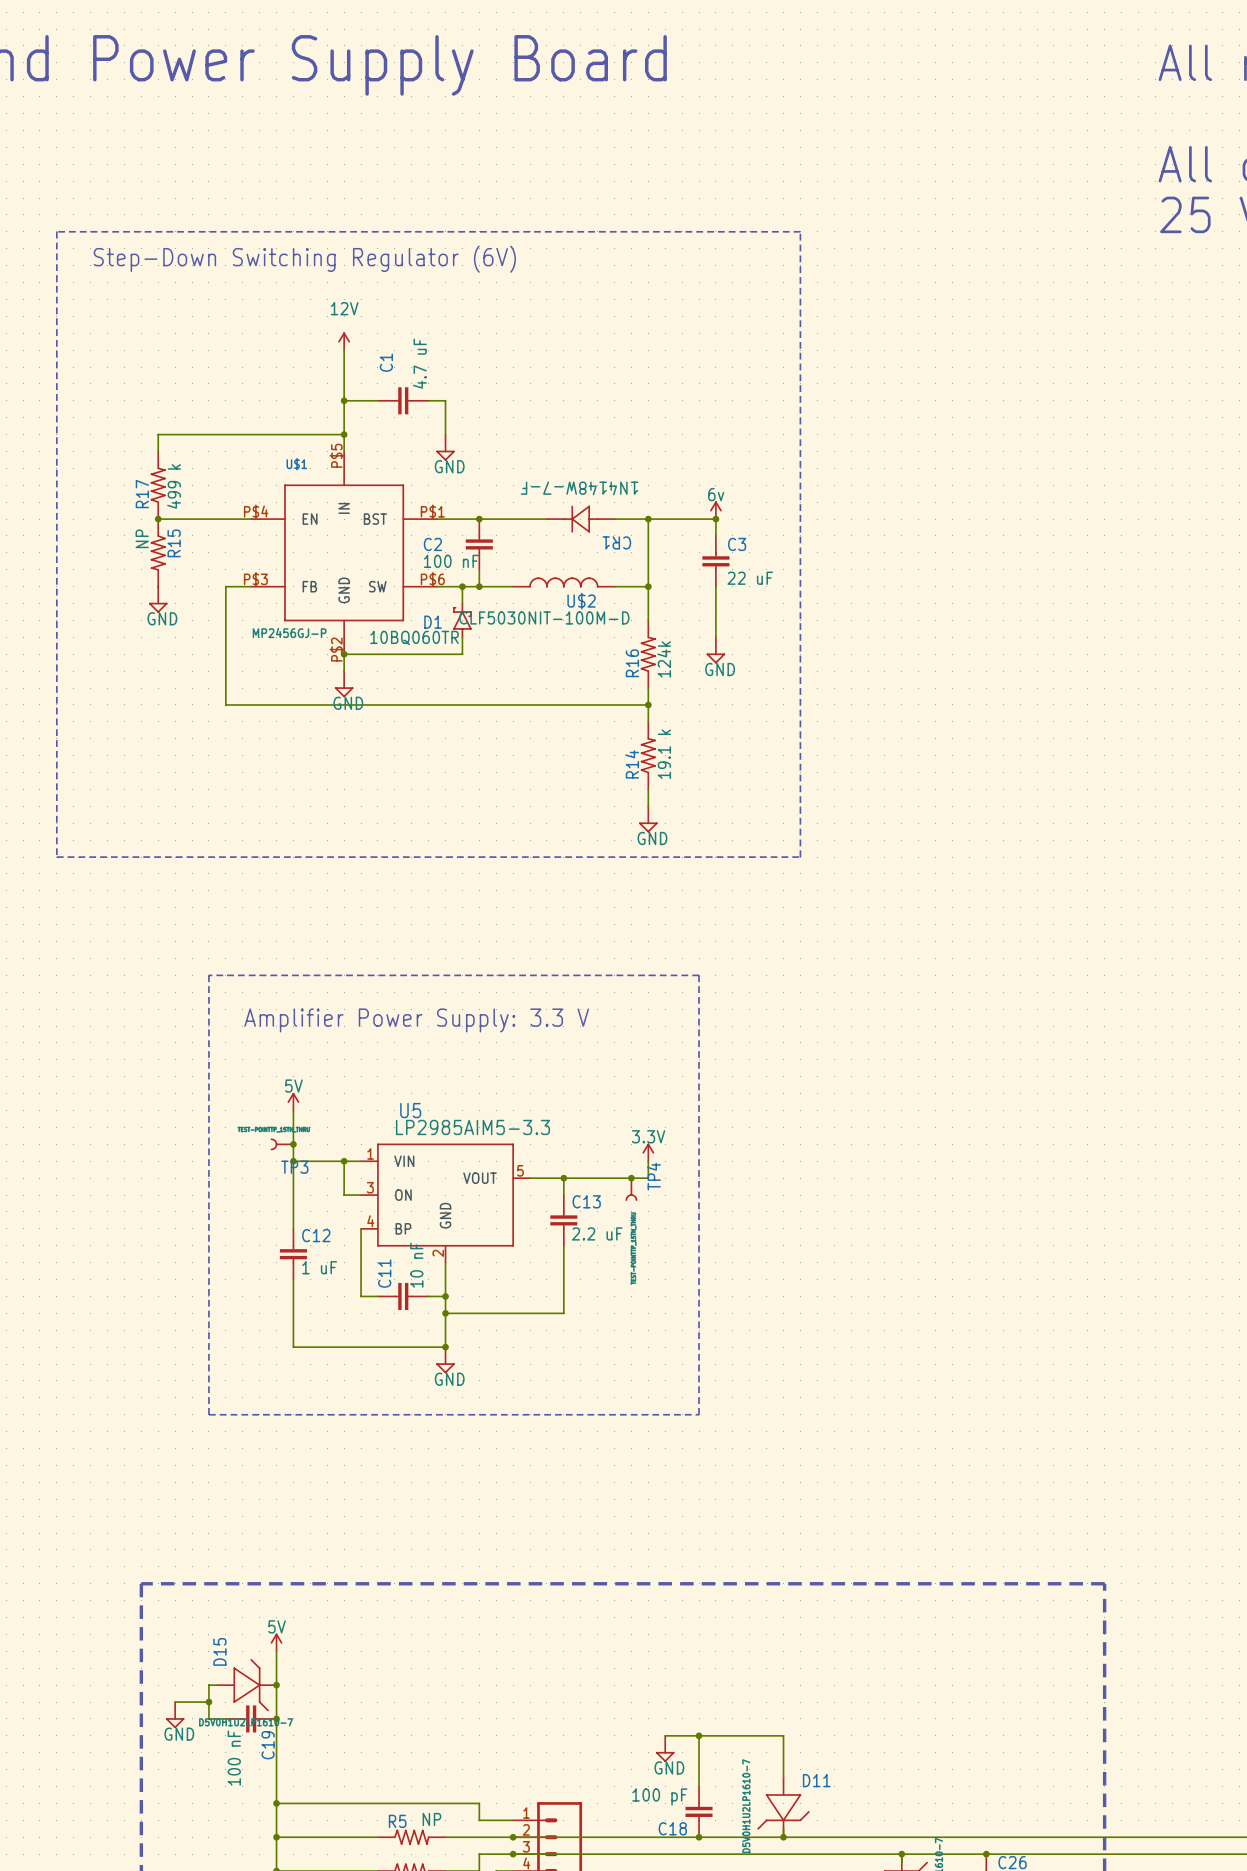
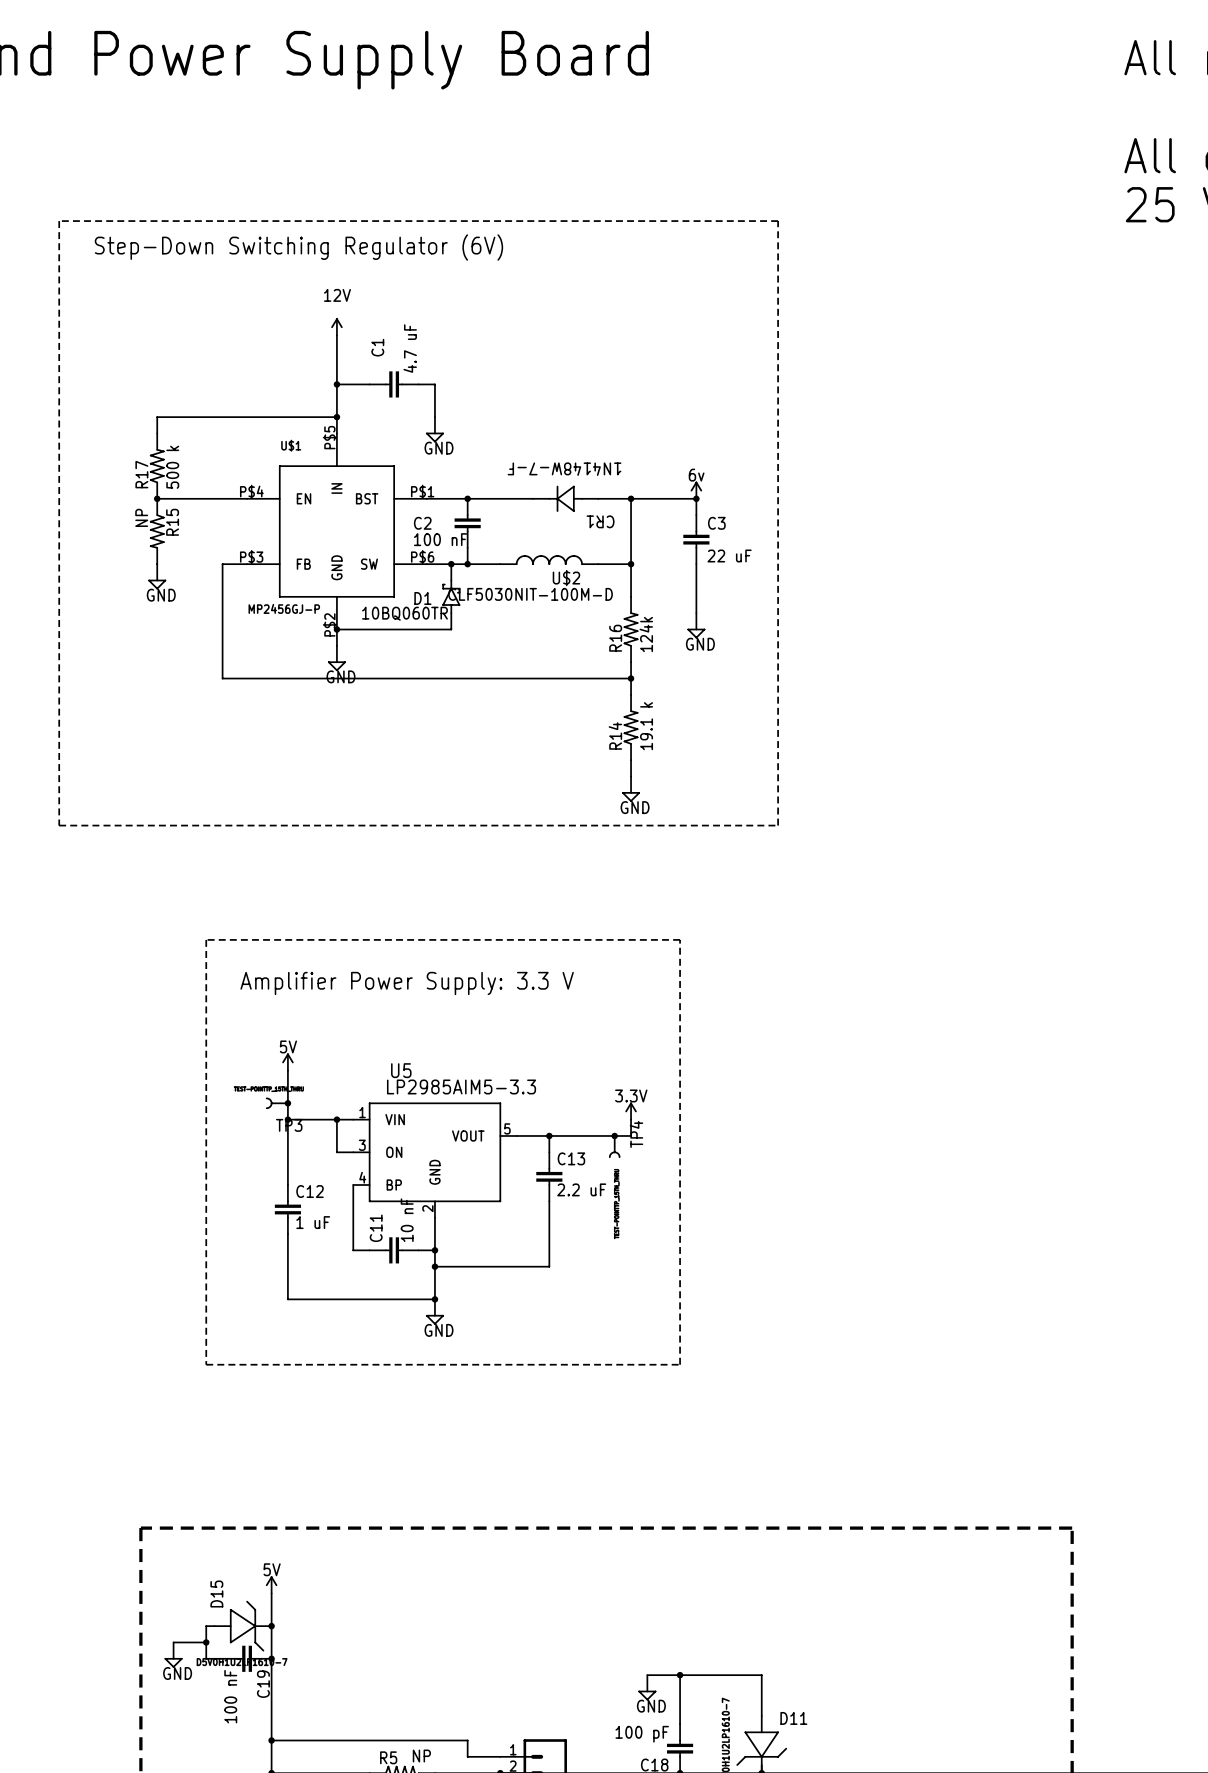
R17 value: 499 k (174, 486) -> 500 k (172, 467)

